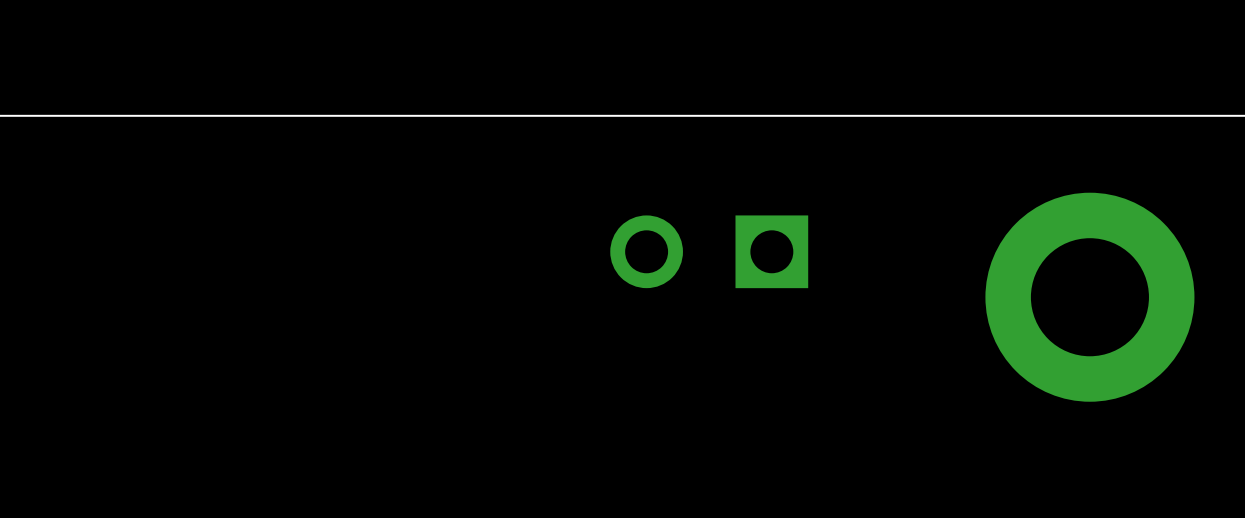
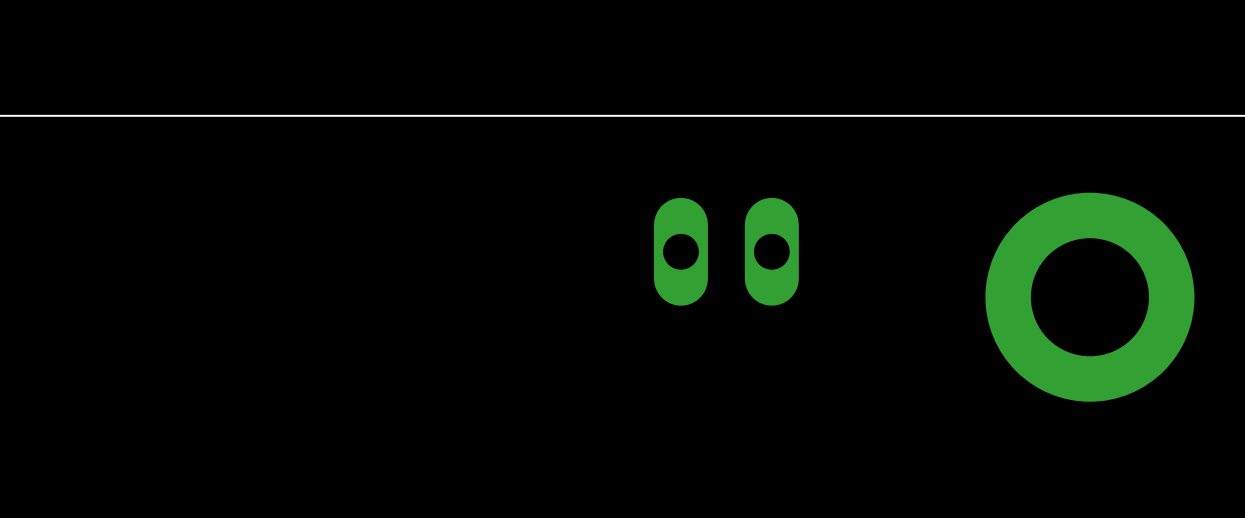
part footprint: [610, 215, 809, 289] -> [653, 197, 799, 306]

